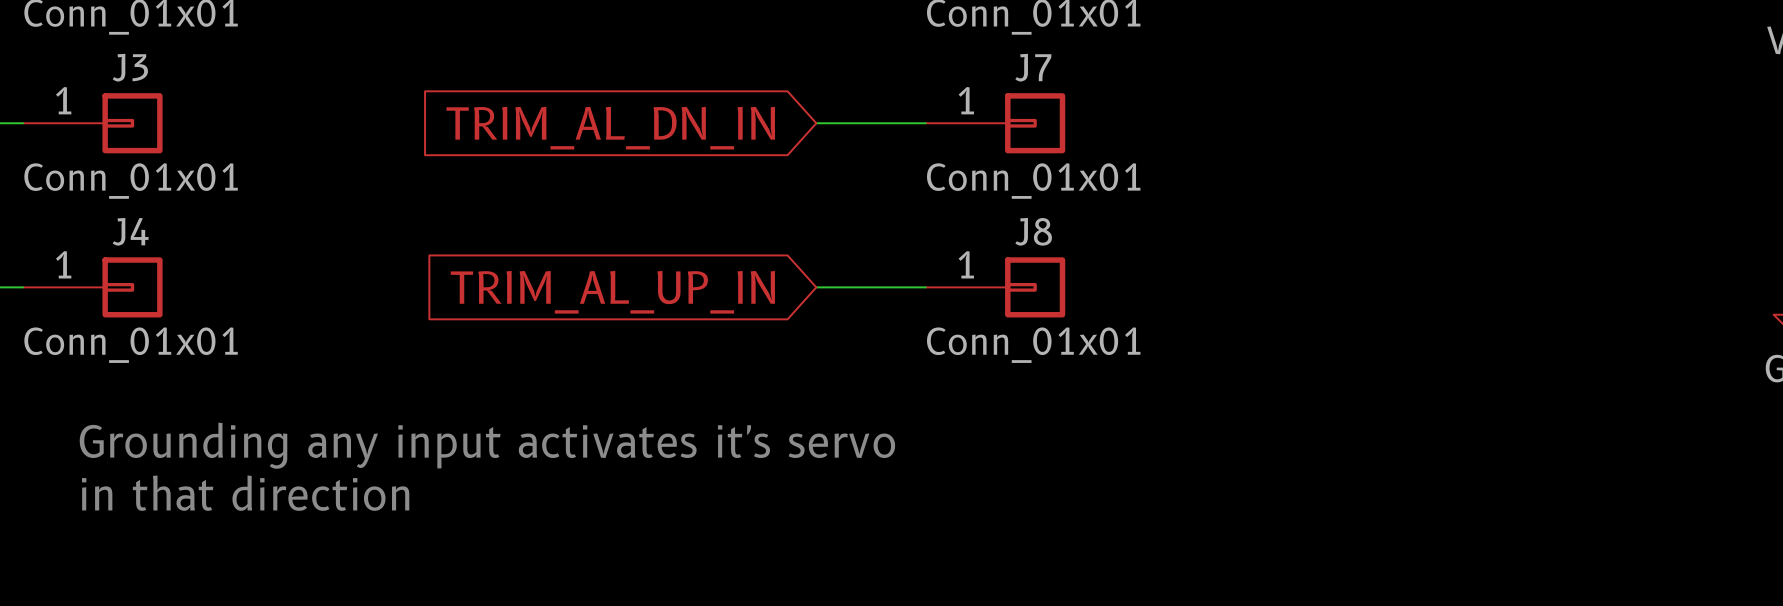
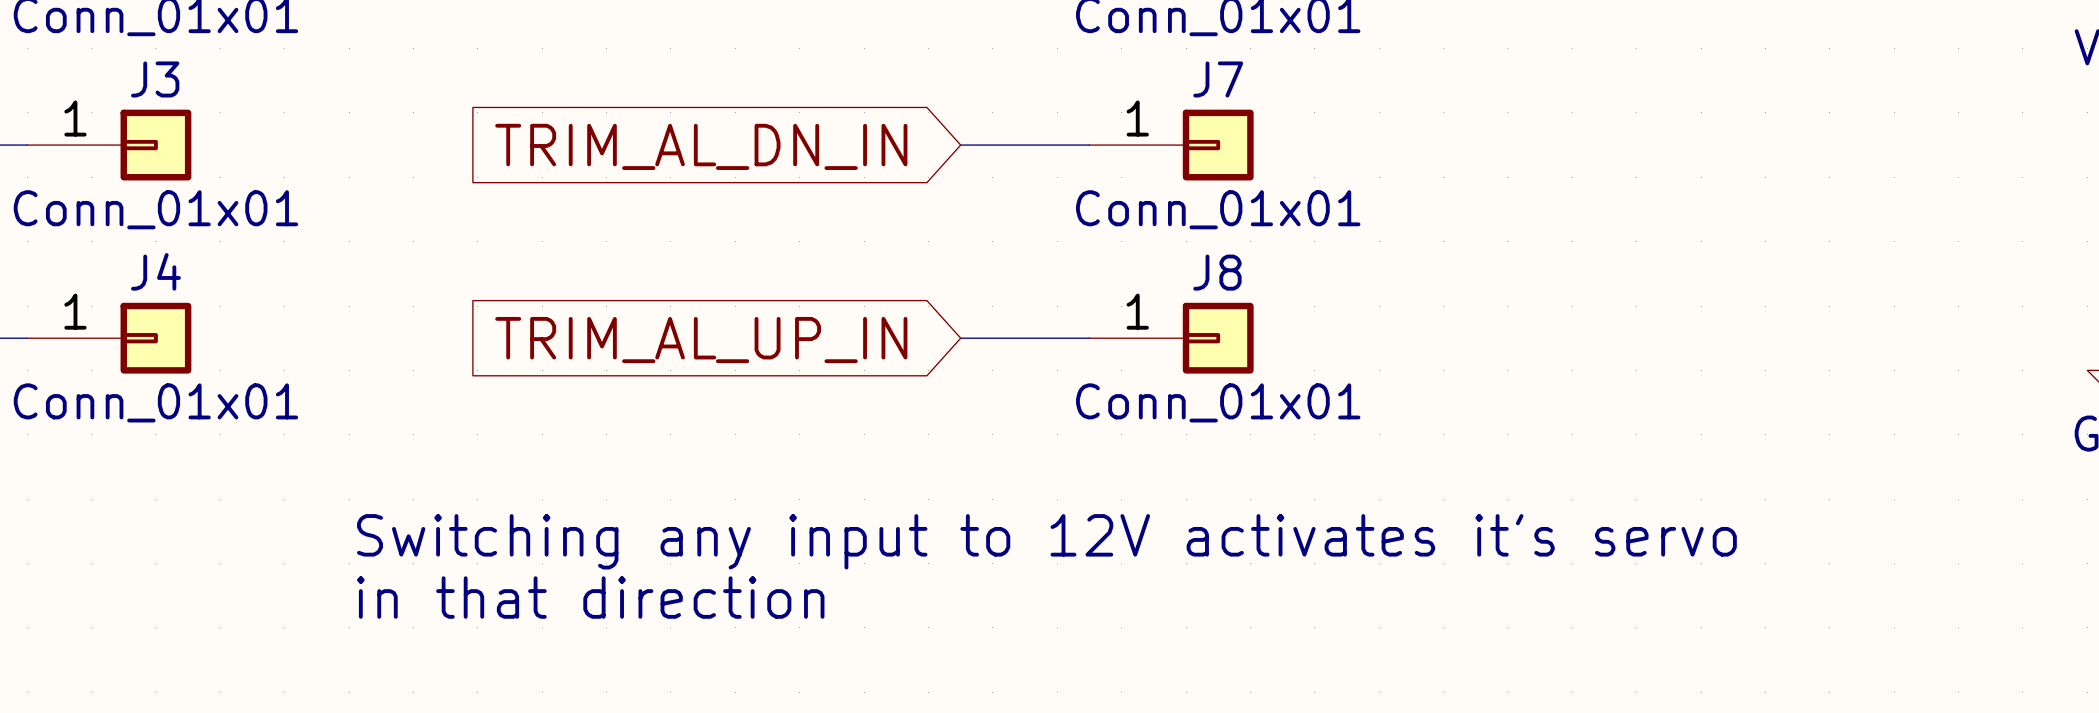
text: Grounding any input activates it's servo (487, 445) -> Switching any input to 12V activates it's servo (1046, 541)
text position: in that direction (245, 493) -> in that direction (590, 597)

